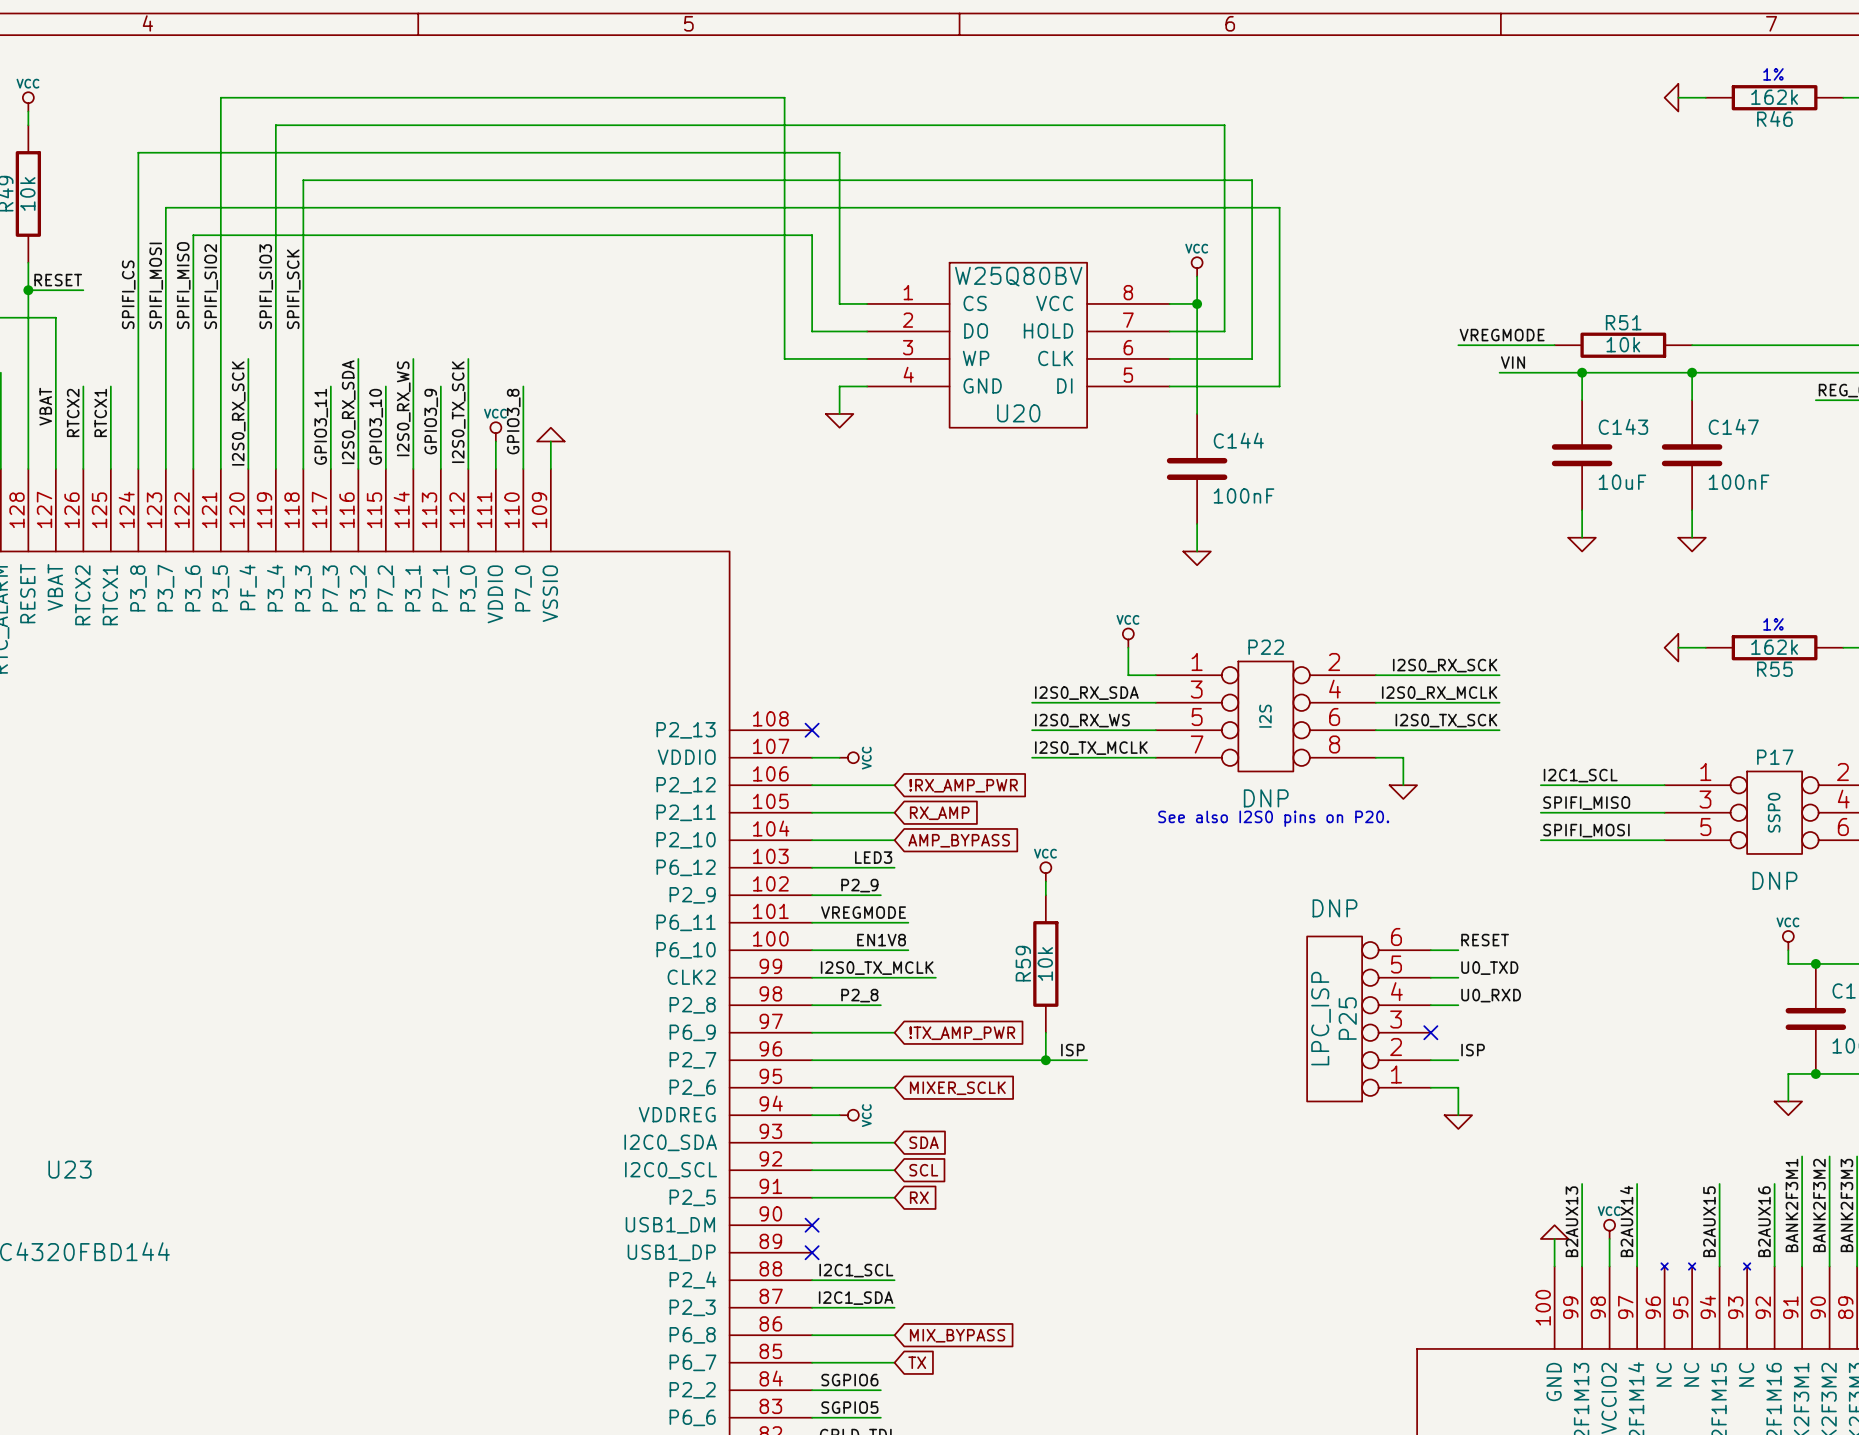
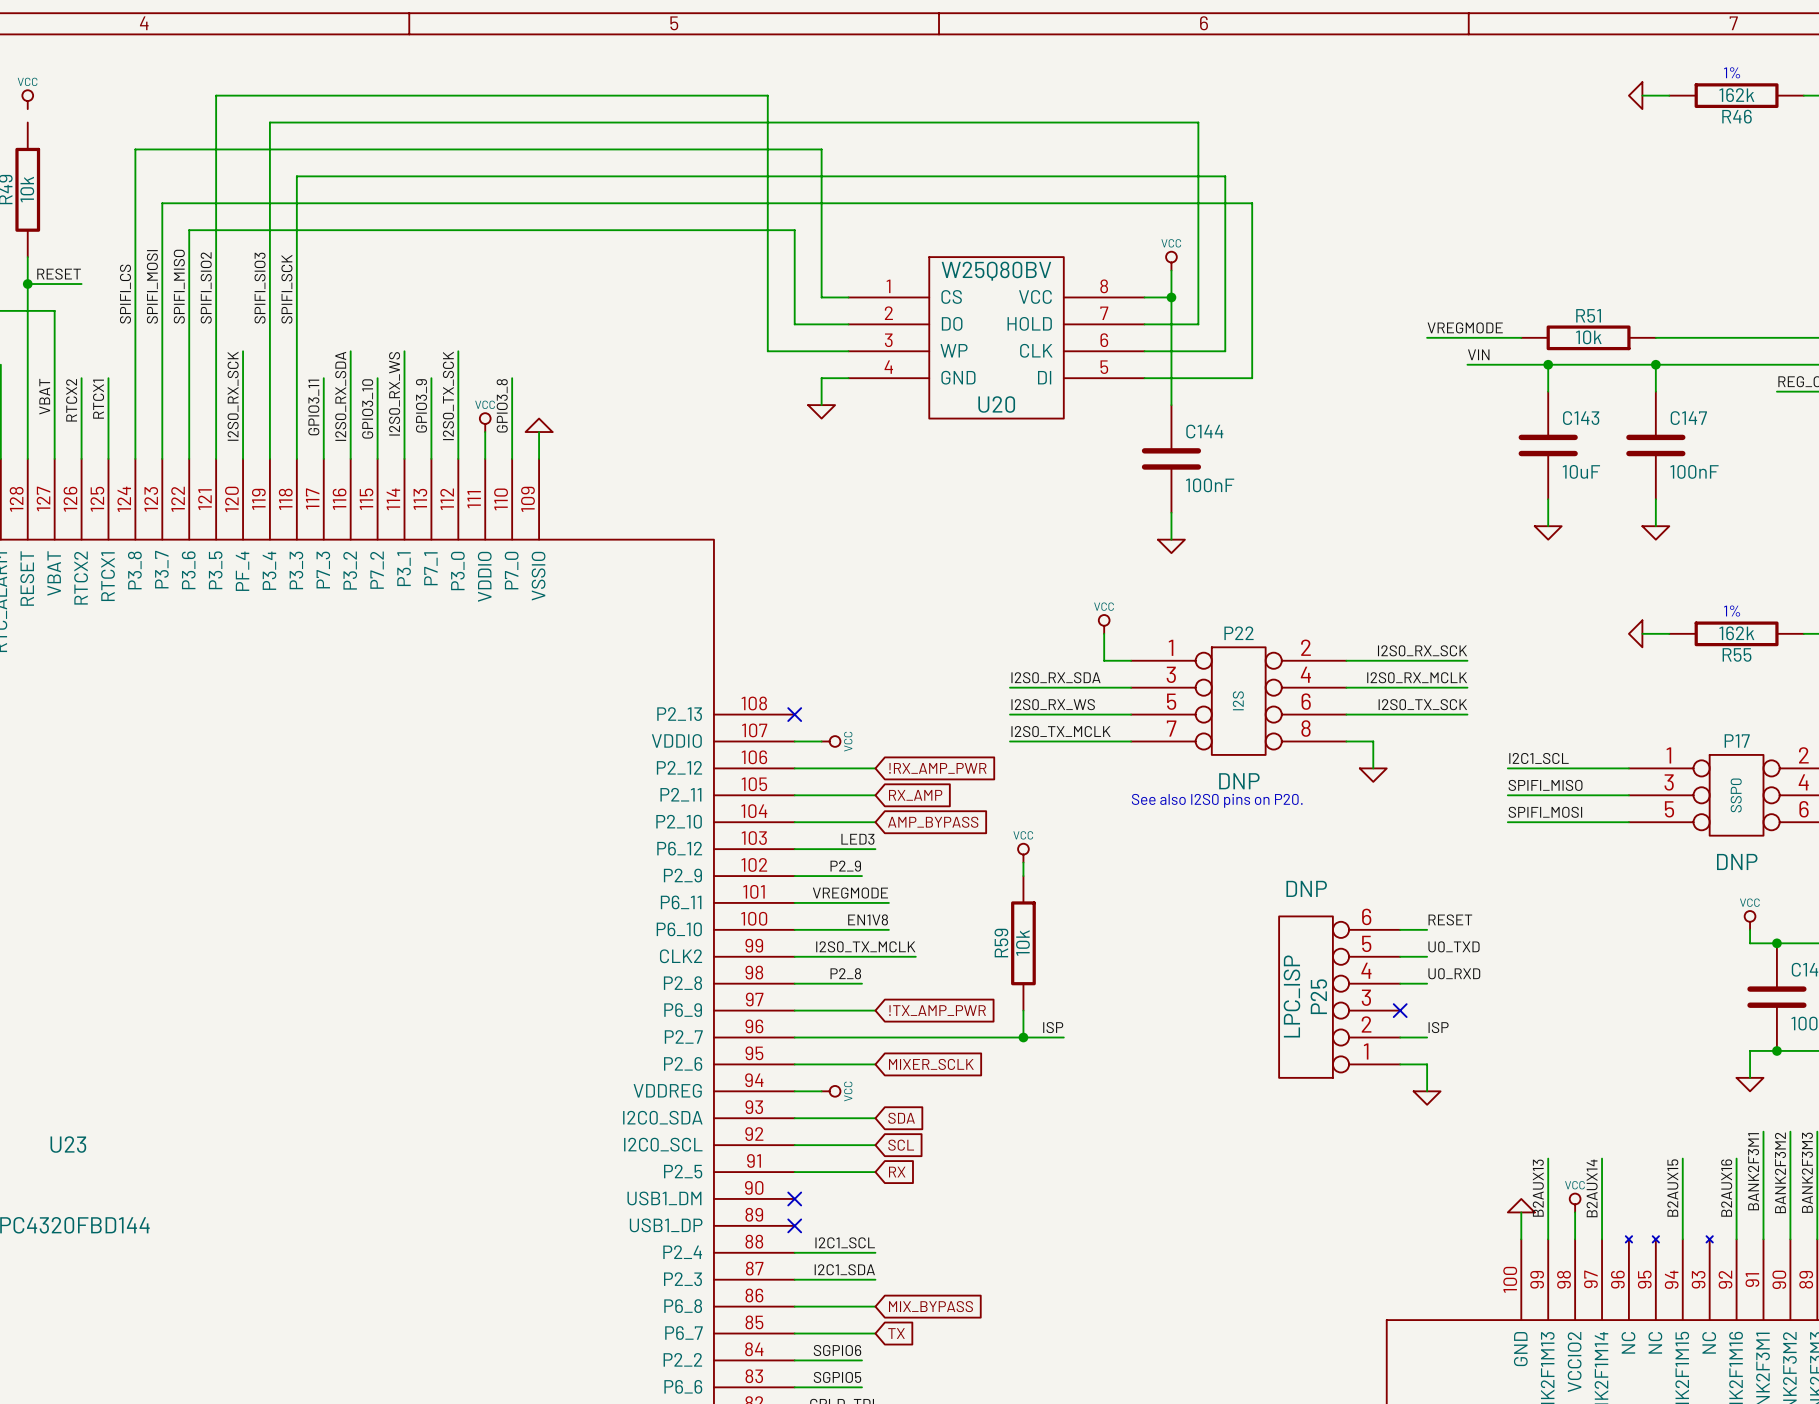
wire: (28, 111) (28, 125) -> none

